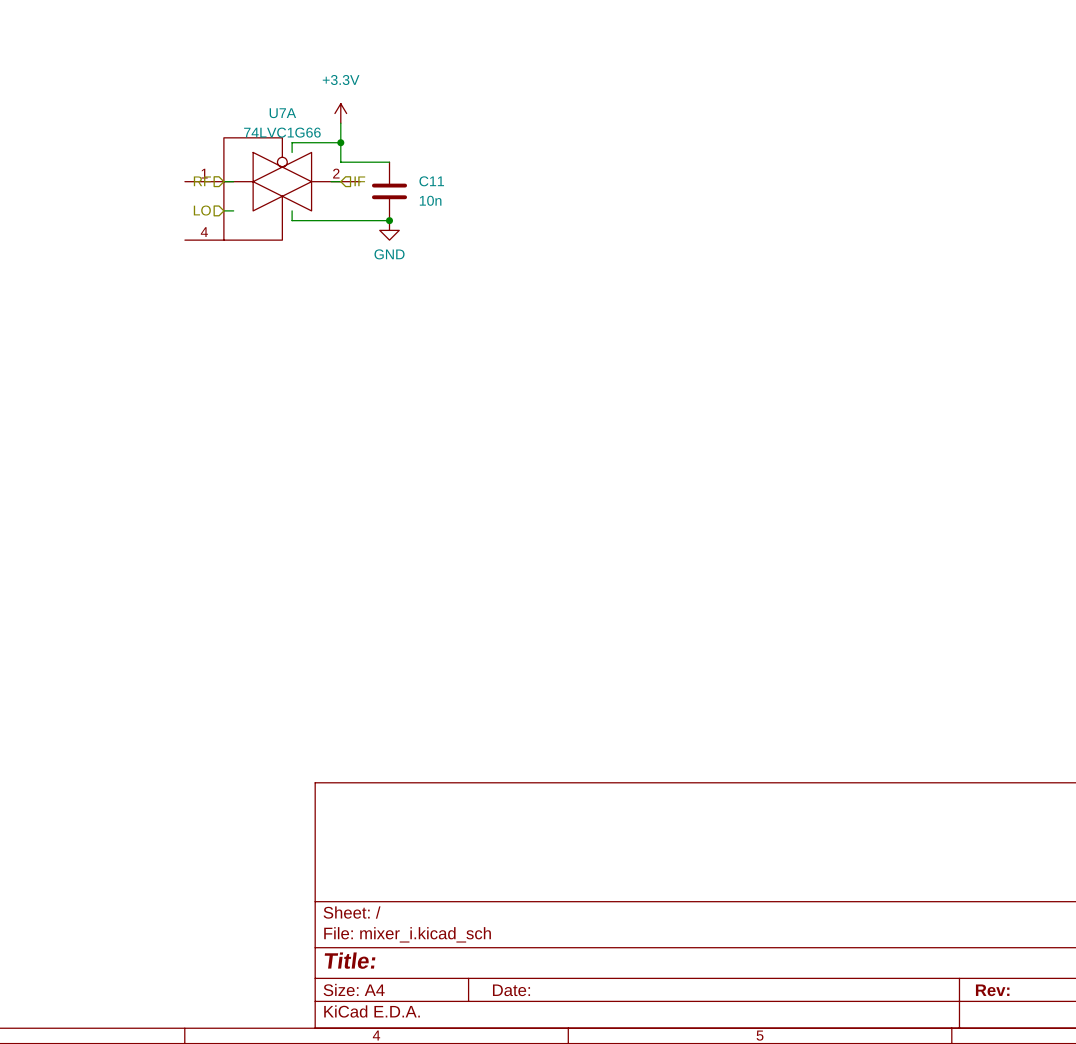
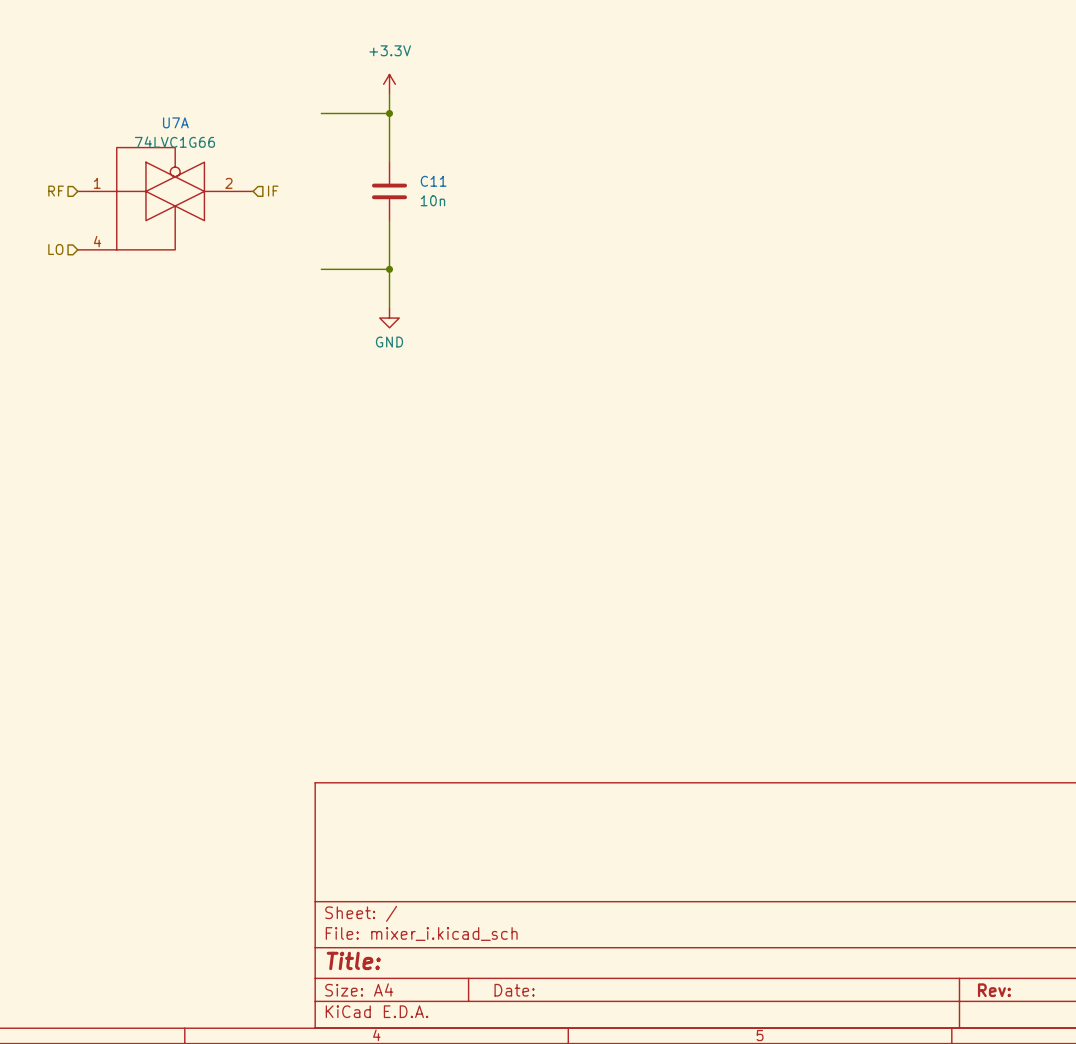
wire: none -> (321, 113) (389, 113)
power symbol position: +3.3V (340, 113) -> +3.3V (389, 84)
junction: none -> (389, 113)
wire: (340, 123) (340, 162) (389, 162) -> (389, 94) (389, 162)
wire: (340, 142) (292, 142) (292, 152) -> none
junction: (340, 142) -> none
hierarchical label position: RF (202, 181) -> RF (56, 191)
wire: (223, 181) (233, 181) -> none
wire: (331, 181) (340, 181) -> none
hierarchical label position: IF (359, 181) -> IF (273, 191)
U7A position: (272, 188) -> (165, 198)
hierarchical label position: LO (202, 210) -> LO (55, 249)
wire: (223, 210) (233, 210) -> none
wire: (292, 210) (292, 220) (389, 220) -> (389, 308) (389, 220)
junction: (389, 220) -> none
power symbol position: GND (389, 230) -> GND (389, 318)
wire: none -> (321, 269) (389, 269)
junction: none -> (389, 269)

